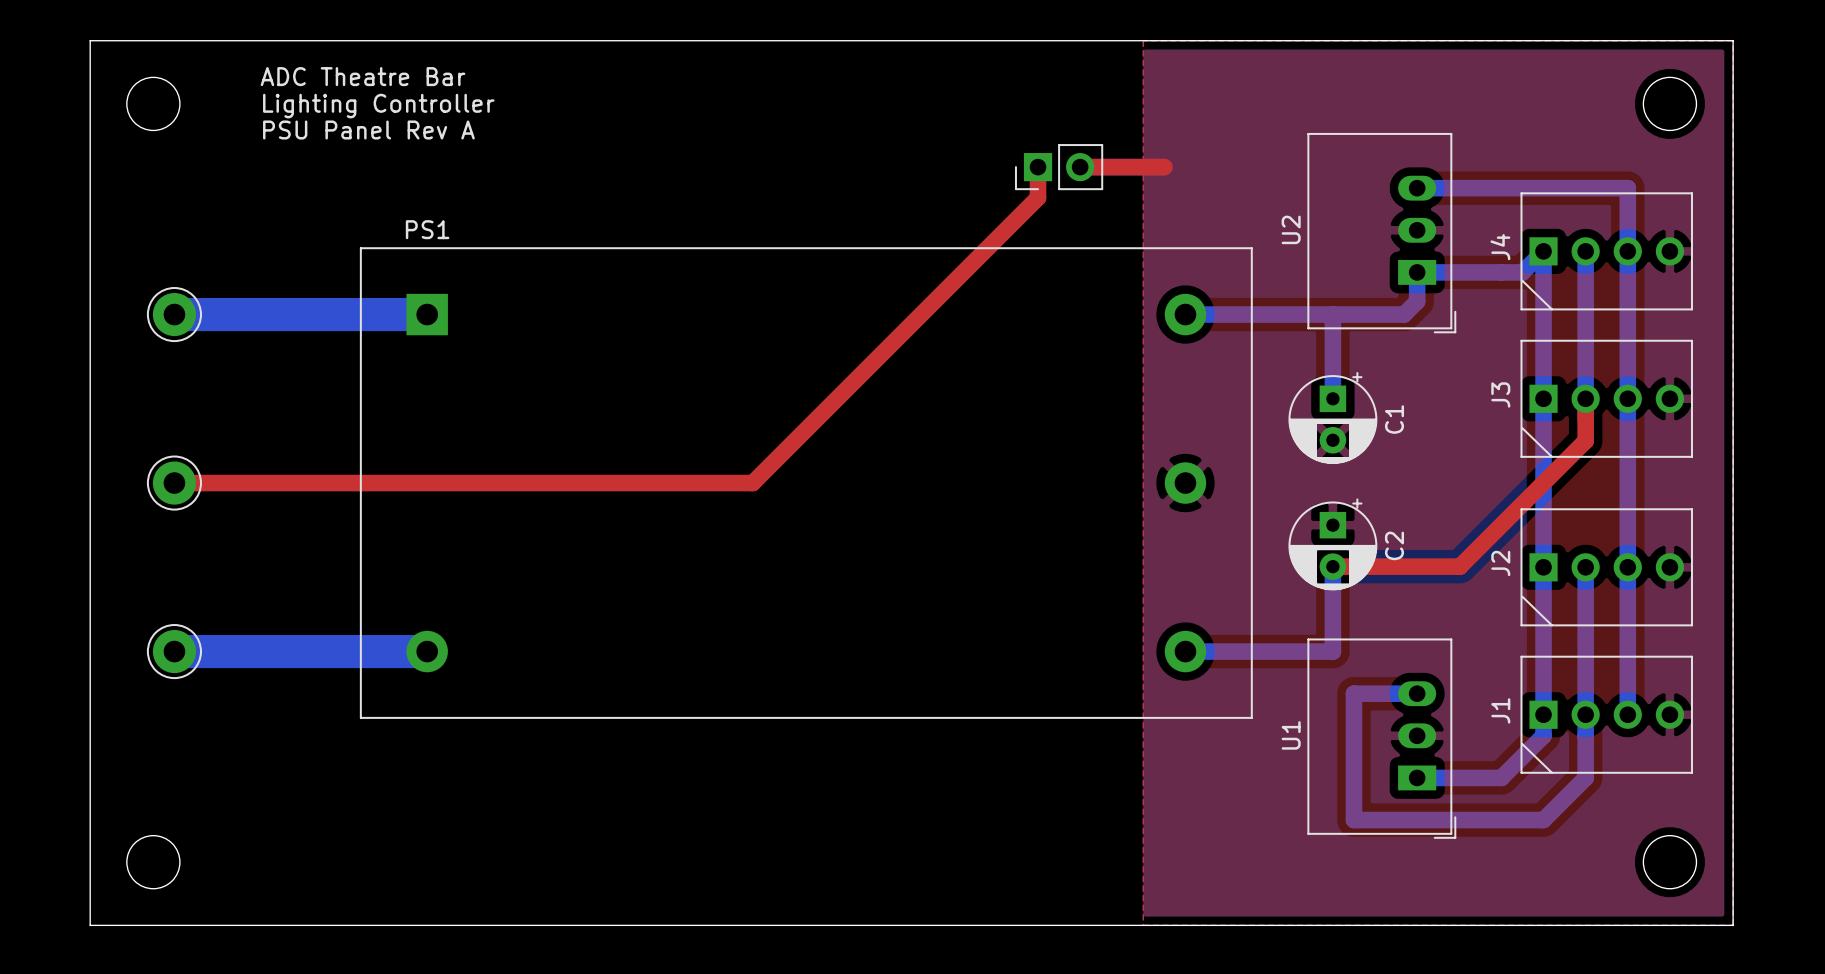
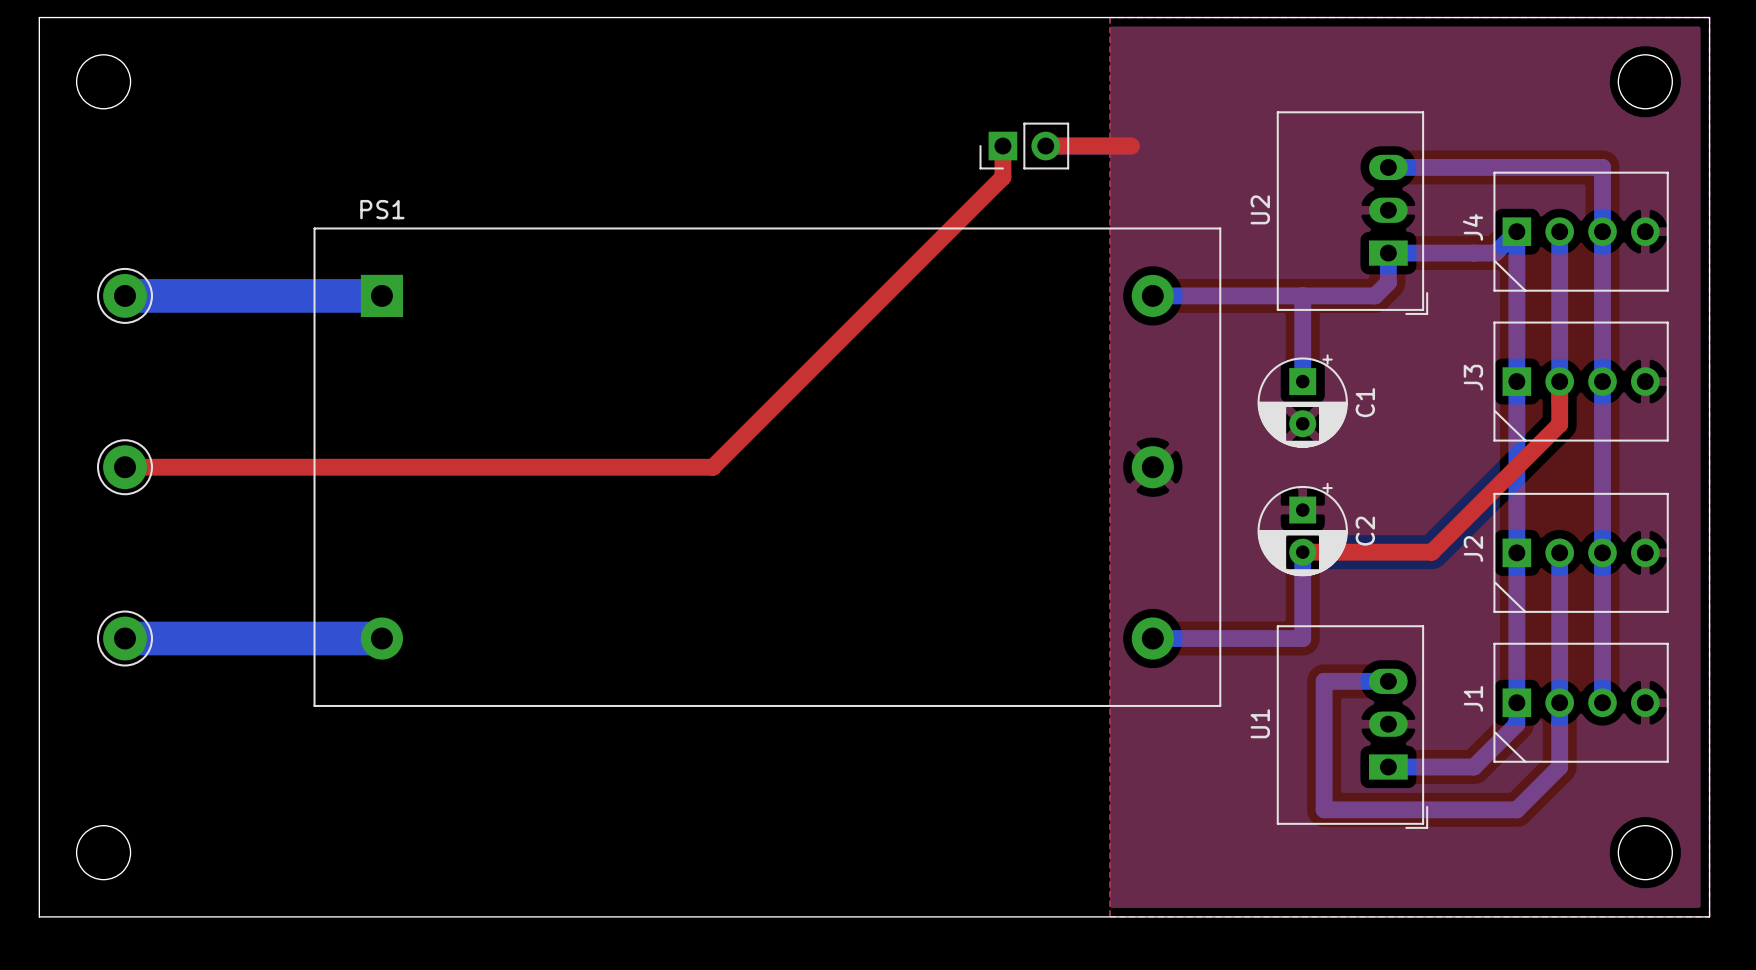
text: ADC Theatre Bar (363, 76) -> none
text: Lighting Controller (378, 106) -> none
text: PSU Panel Rev A (368, 130) -> none

